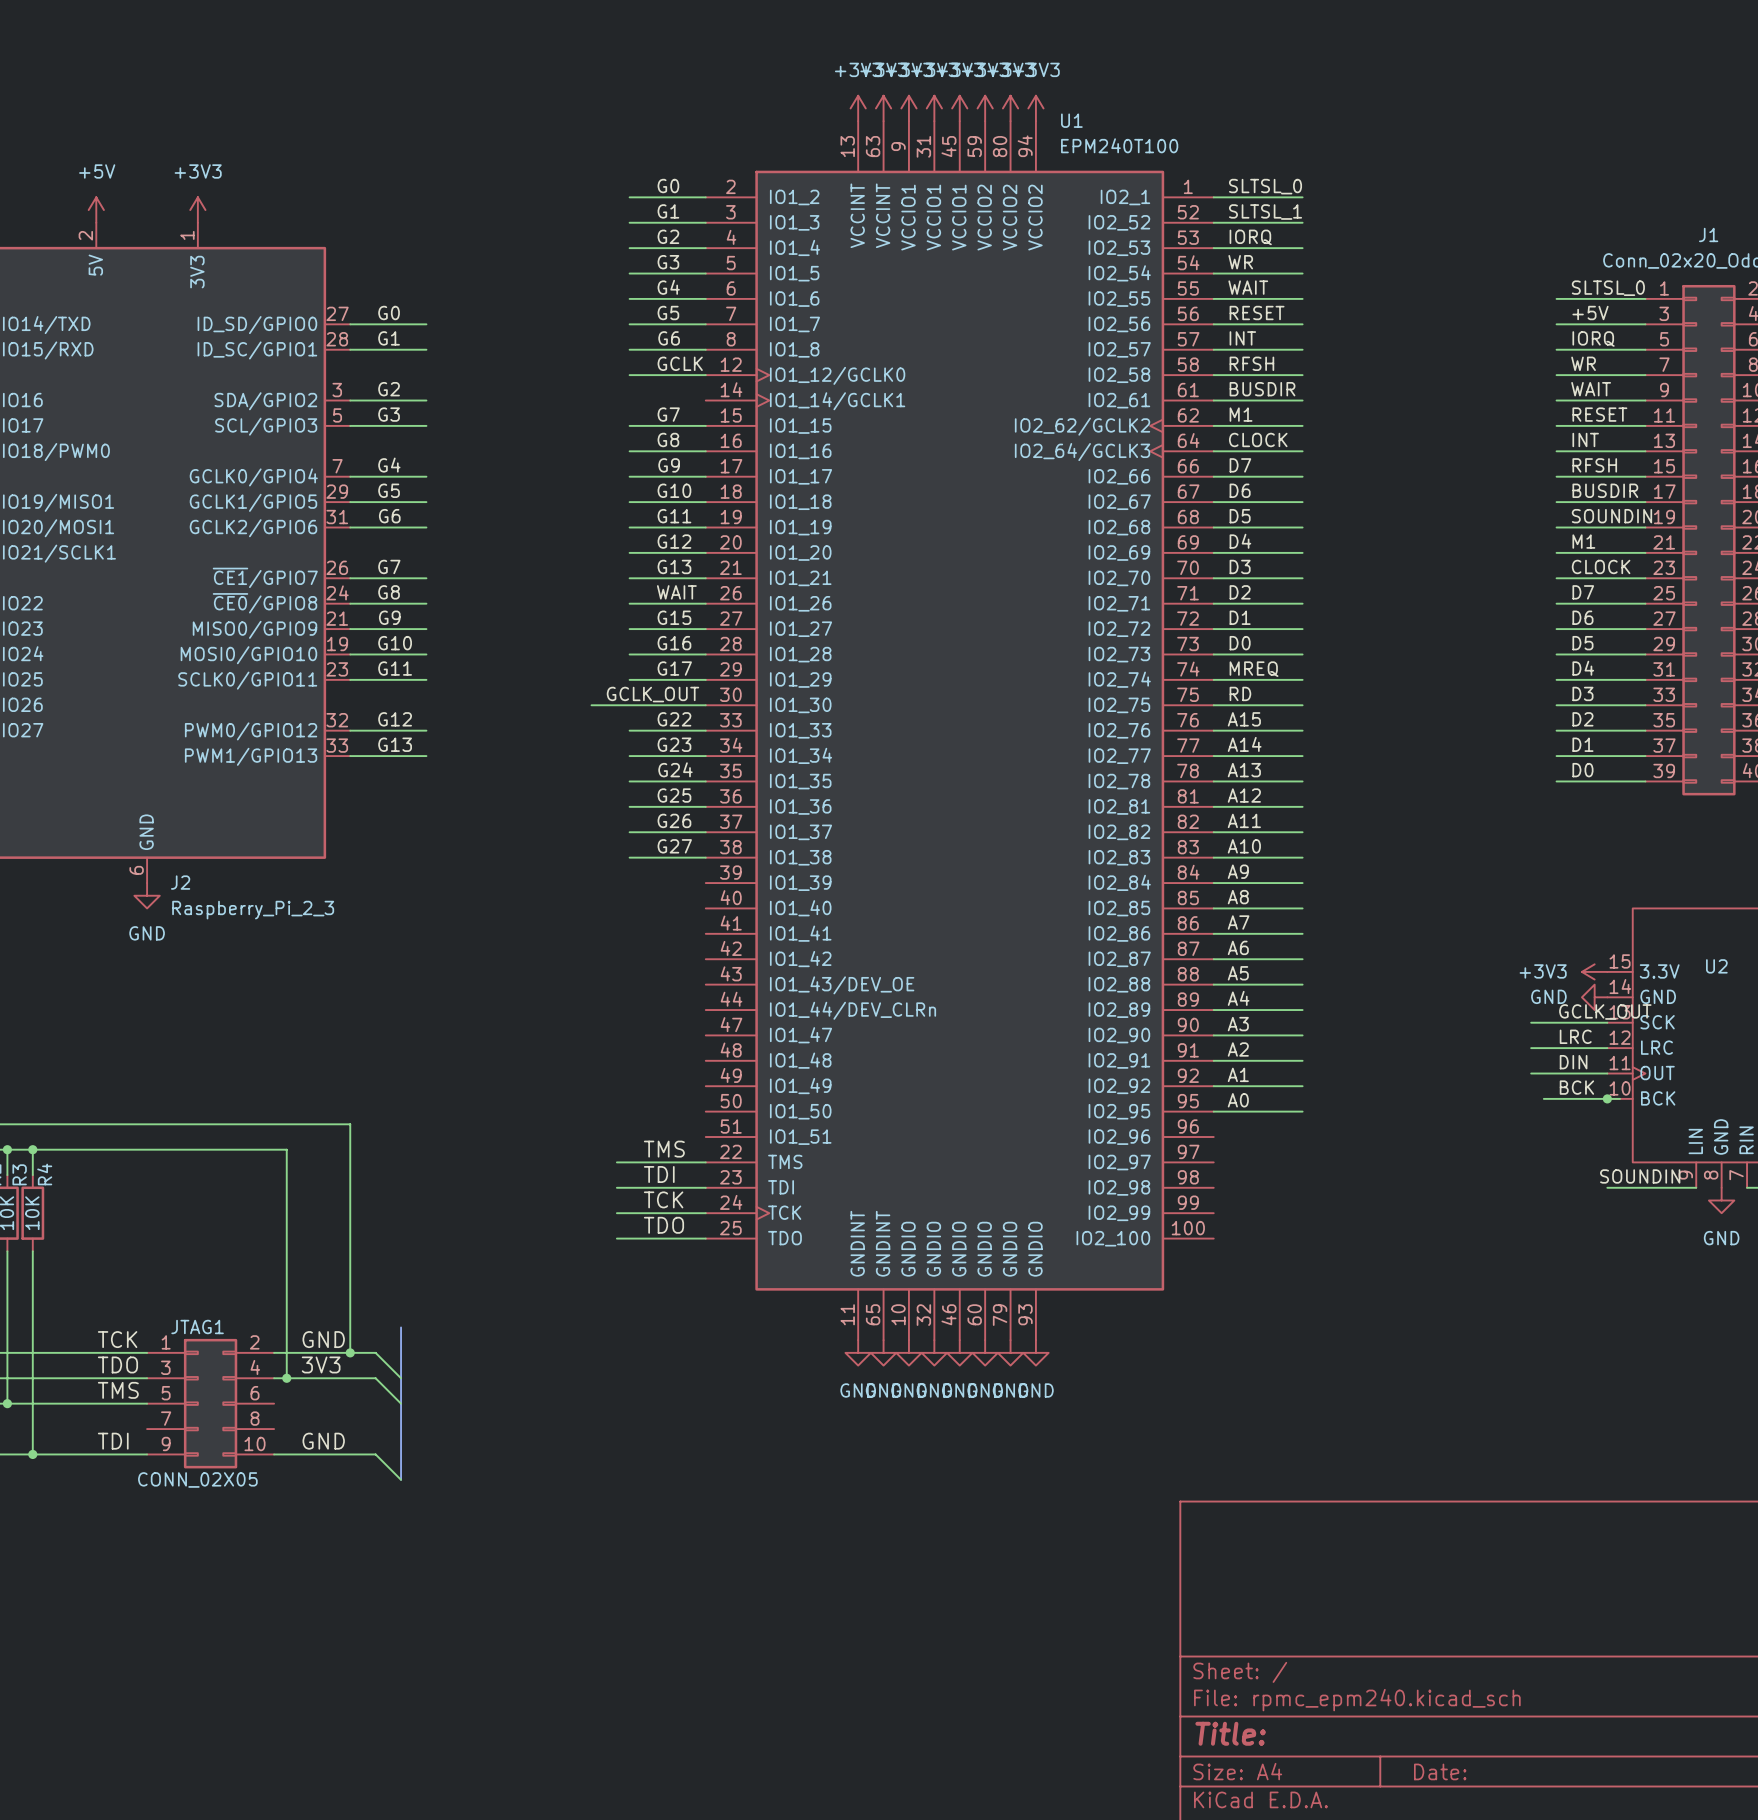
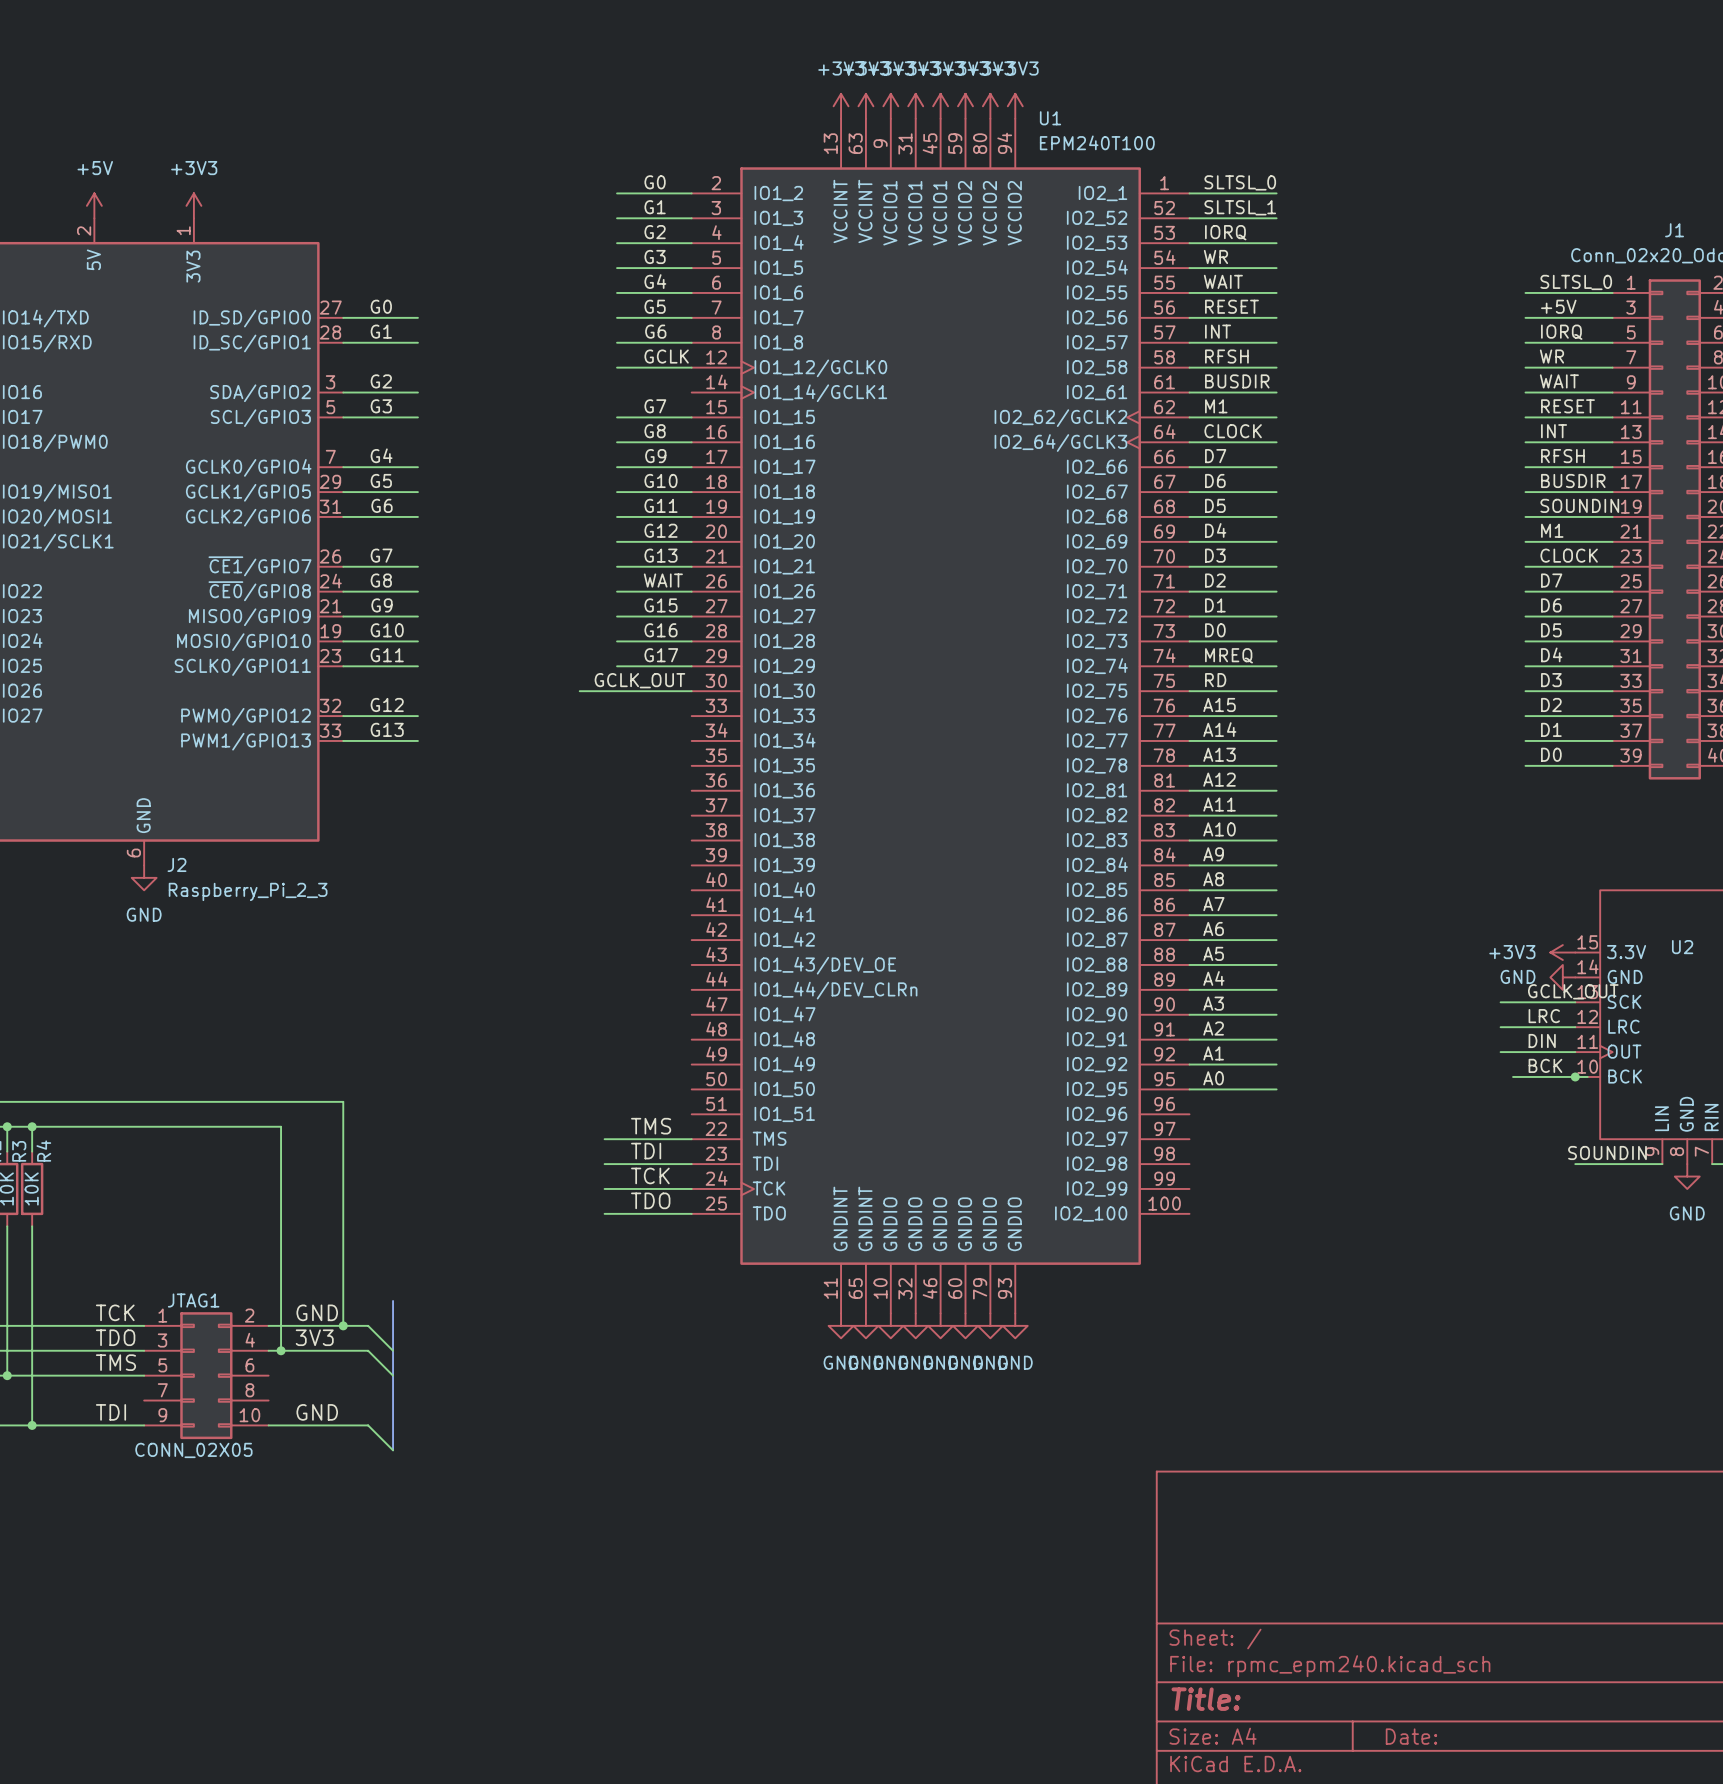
label: G22 (674, 719) -> none
wire: (629, 730) (705, 730) -> none
label: G23 (674, 744) -> none
wire: (629, 756) (705, 756) -> none
label: G24 (675, 769) -> none
wire: (629, 781) (705, 781) -> none
label: G25 (674, 795) -> none
wire: (629, 806) (705, 806) -> none
label: G26 (674, 820) -> none
wire: (629, 832) (705, 832) -> none
label: G27 (674, 846) -> none
wire: (629, 857) (705, 857) -> none

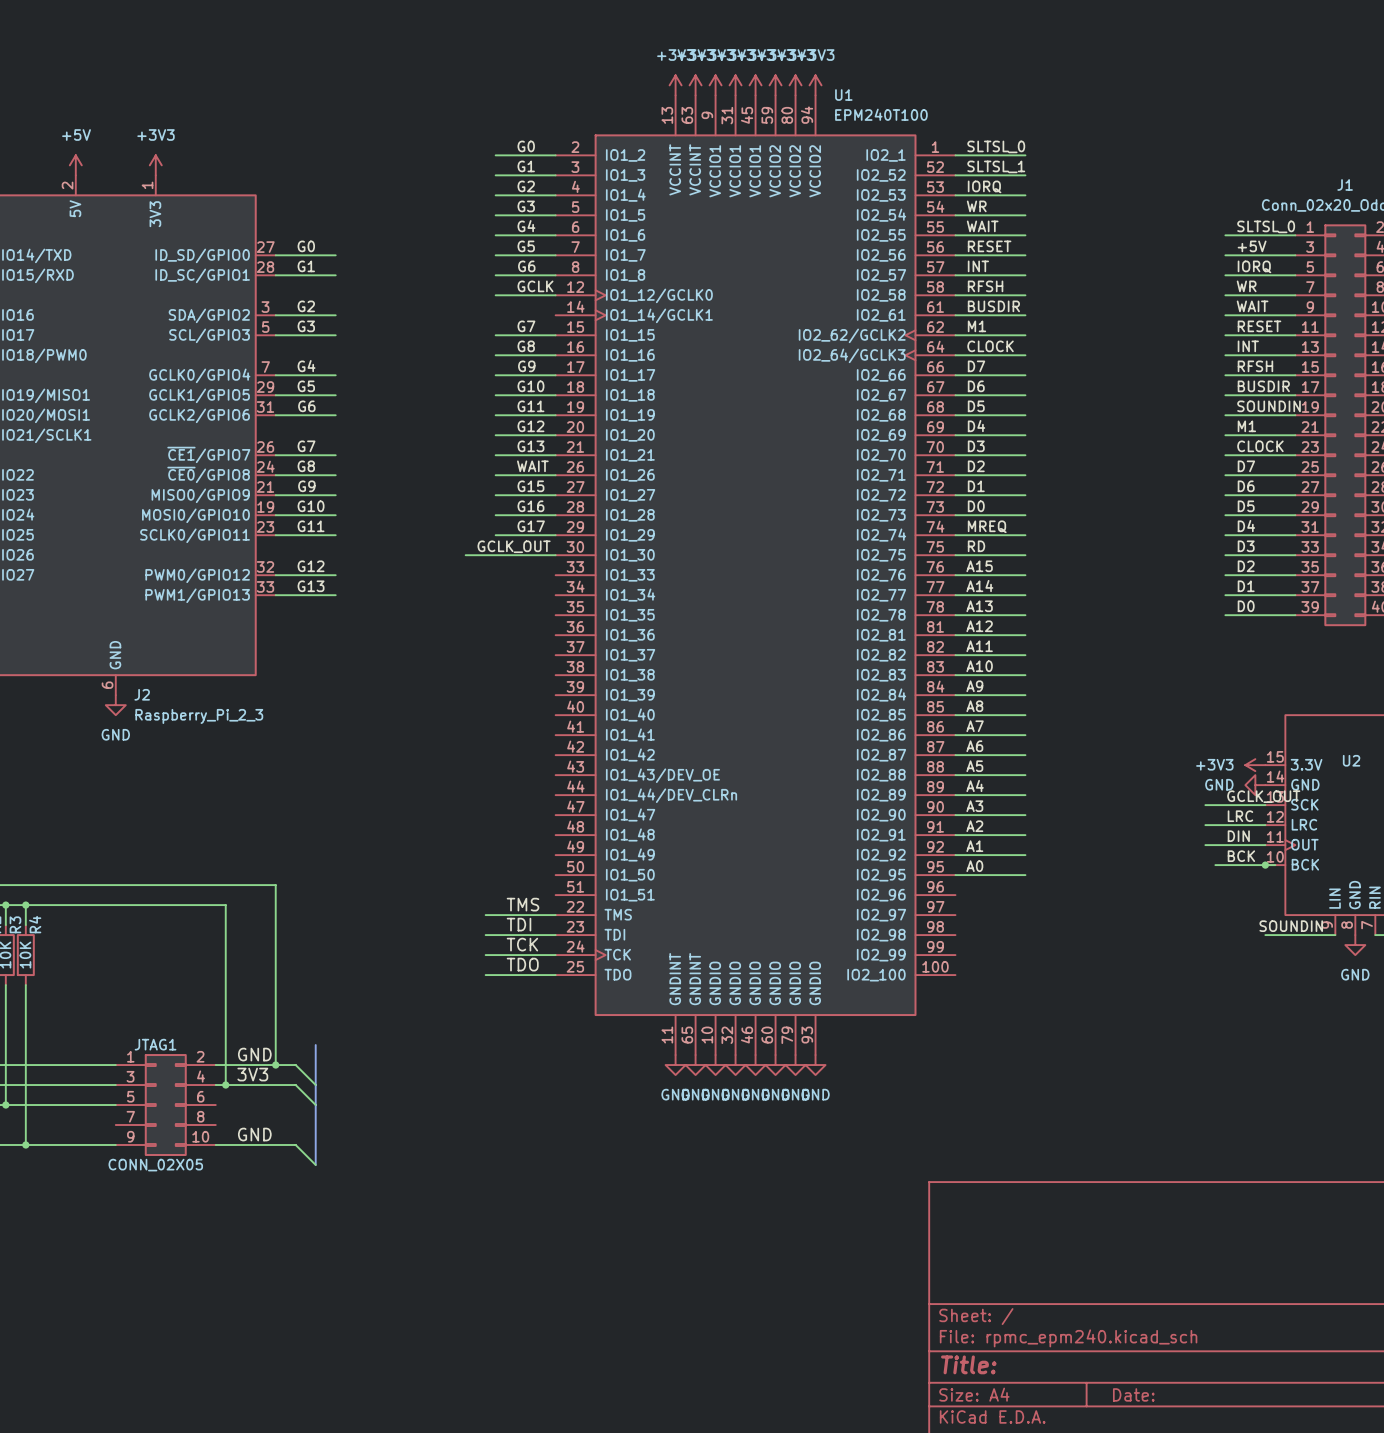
label: TCK (115, 1312) -> none
label: TDO (115, 1337) -> none
label: TMS (115, 1362) -> none
label: TDI (111, 1412) -> none

